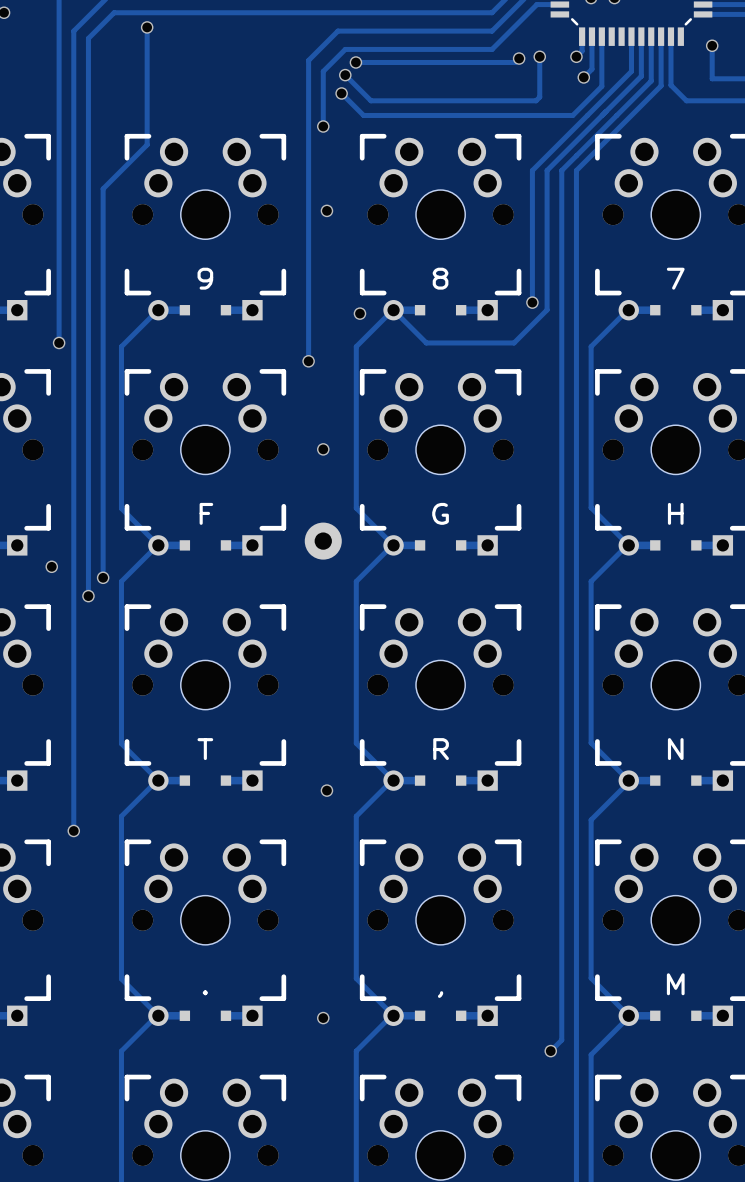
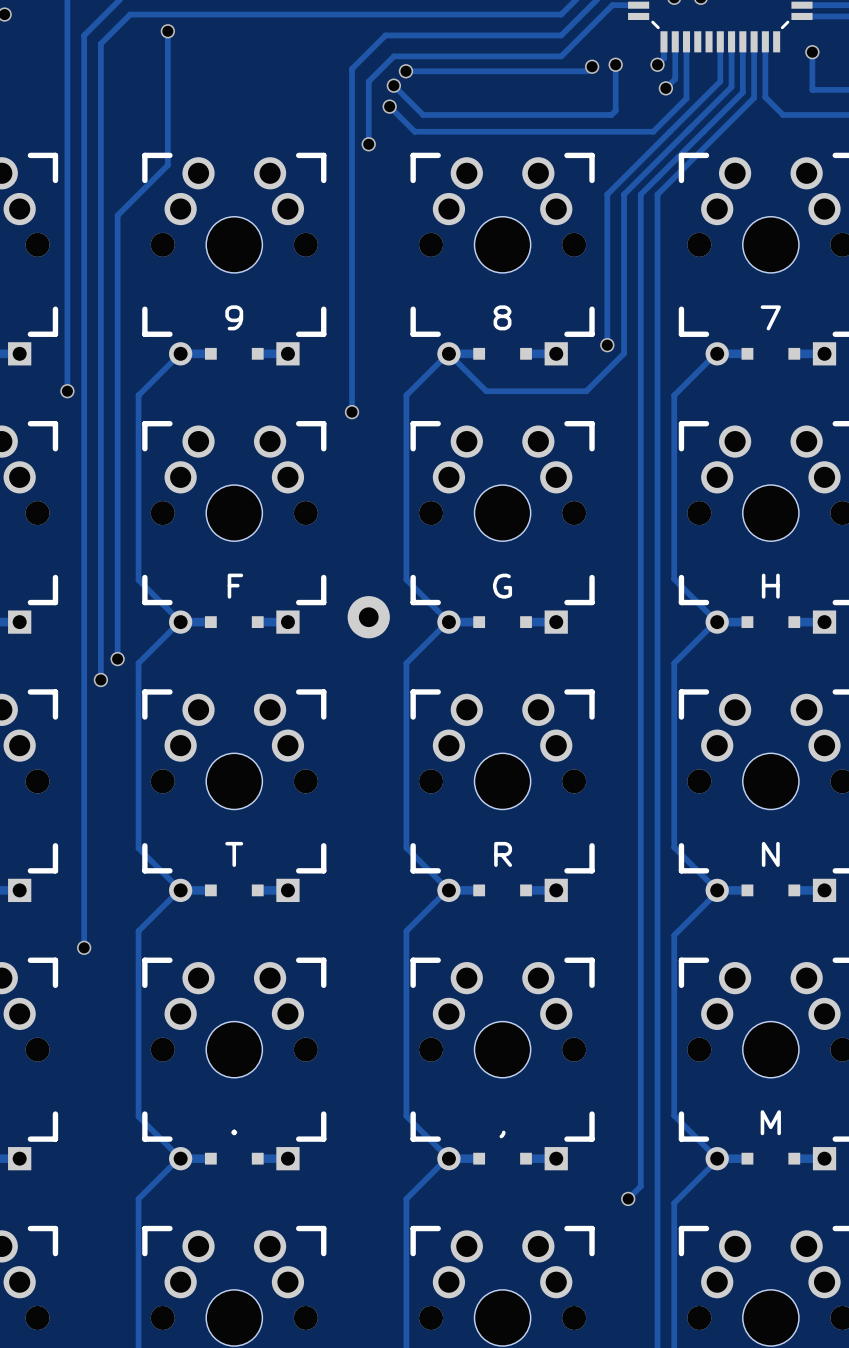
via: (326, 210) -> none
via: (359, 313) -> none
via: (323, 449) -> none
via: (51, 566) -> none
via: (326, 790) -> none
via: (323, 1018) -> none

